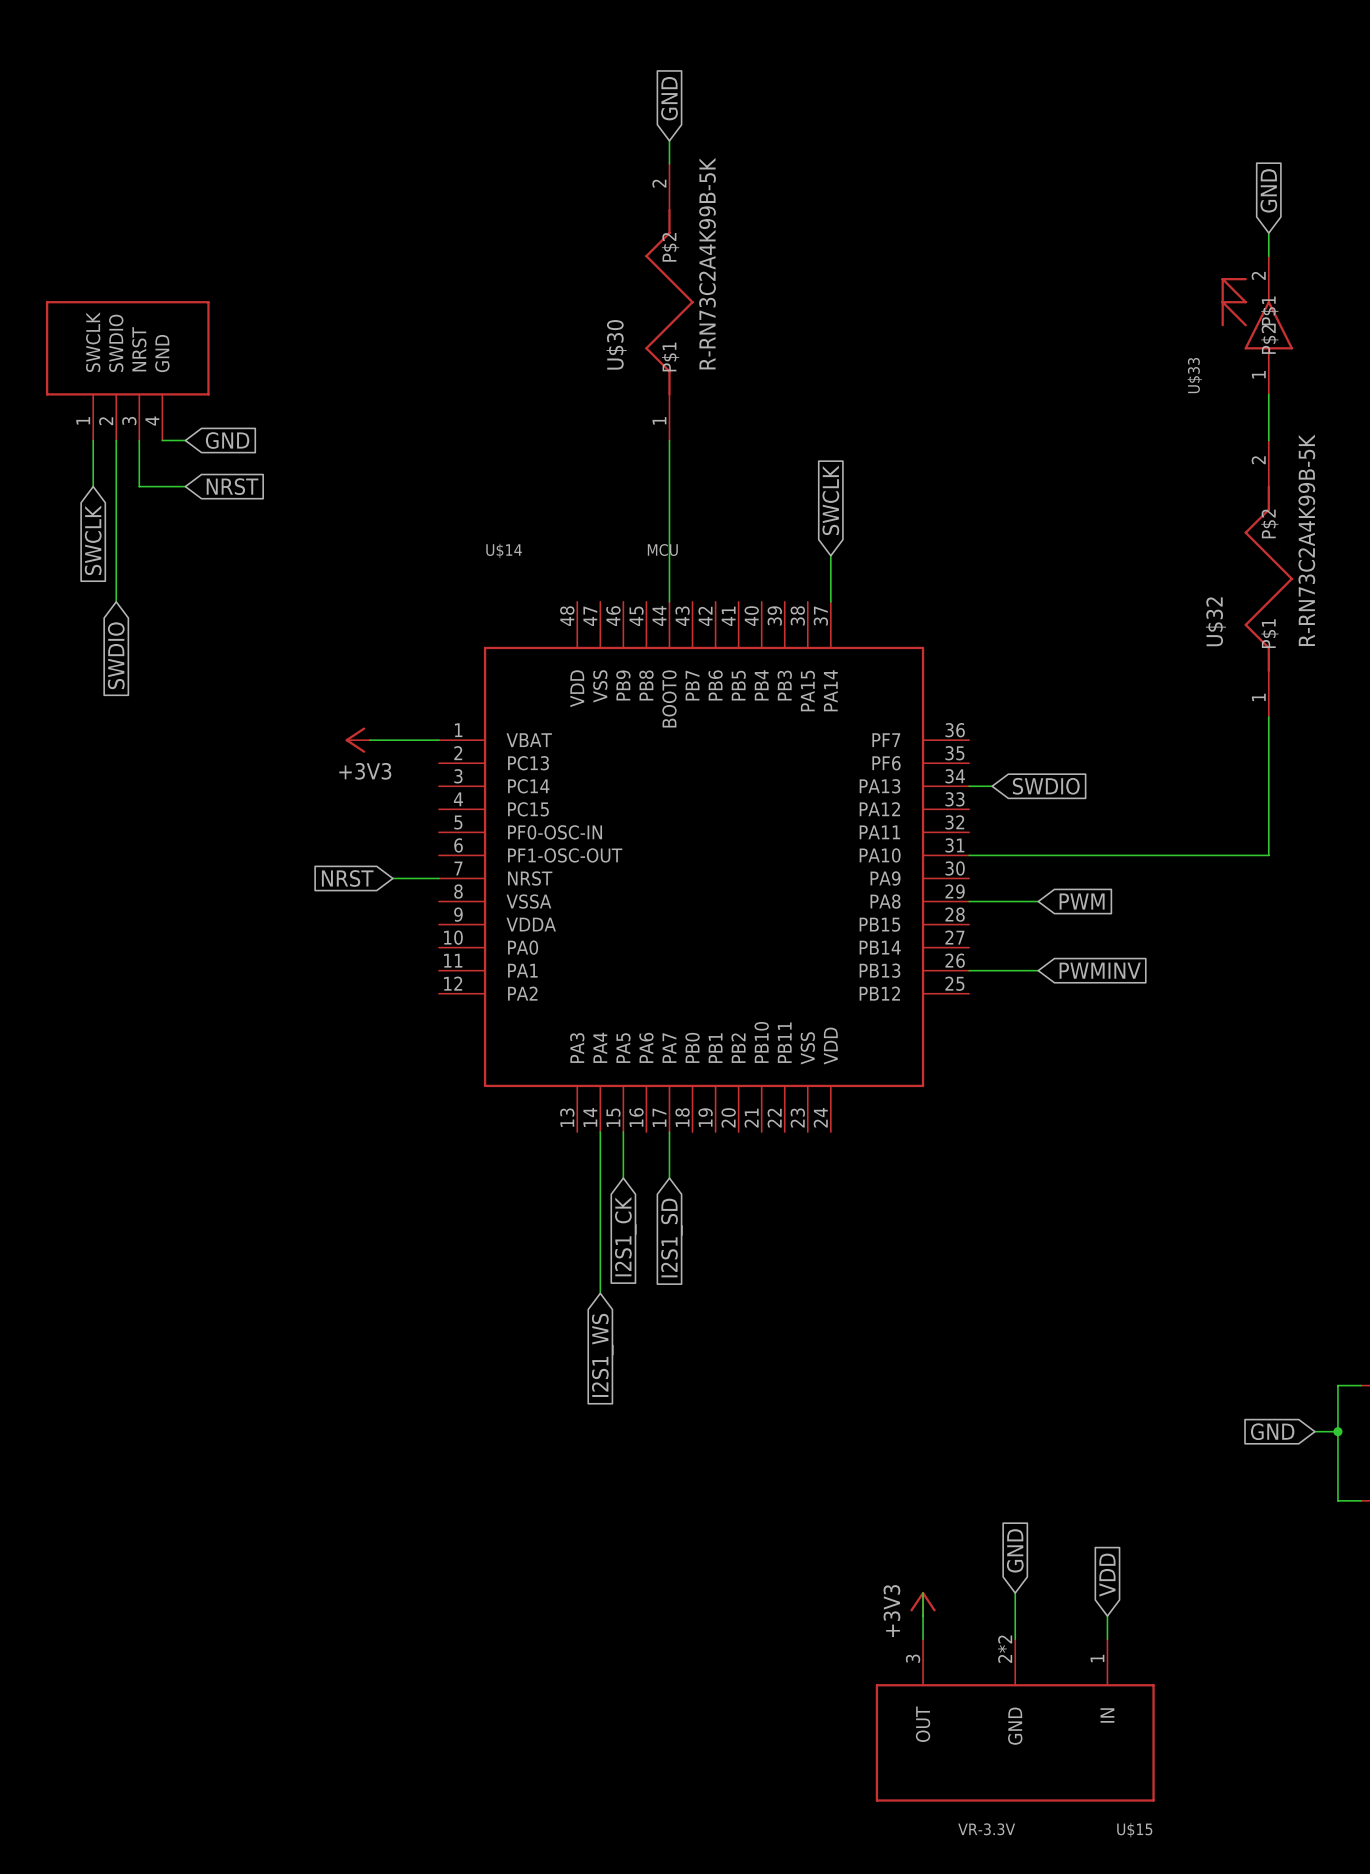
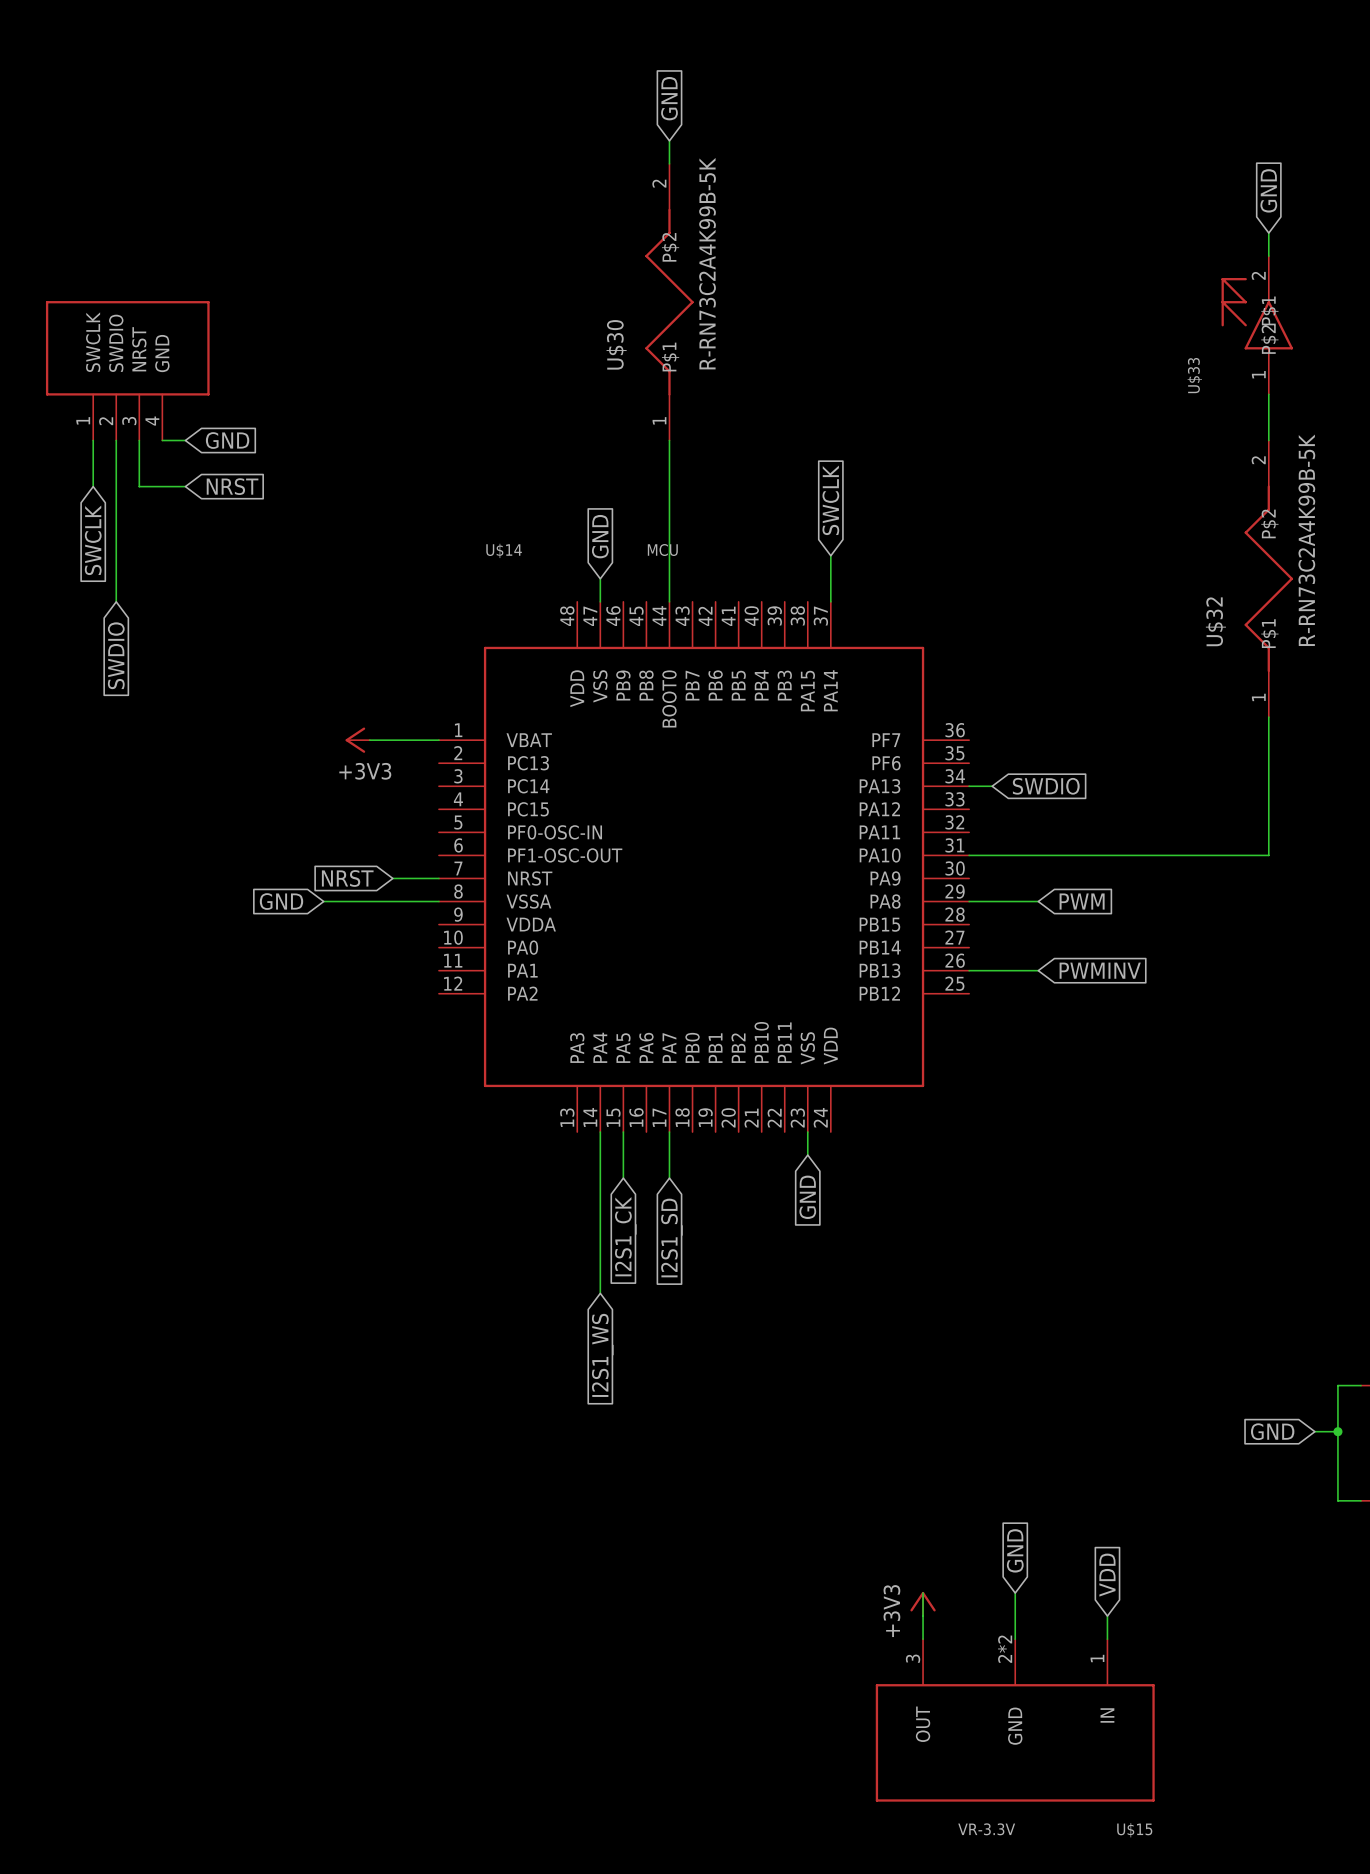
global label: none -> GND (600, 536)
wire: none -> (600, 578) (600, 601)
global label: none -> GND (281, 901)
wire: none -> (323, 901) (438, 901)
wire: none -> (807, 1132) (807, 1155)
global label: none -> GND (807, 1197)

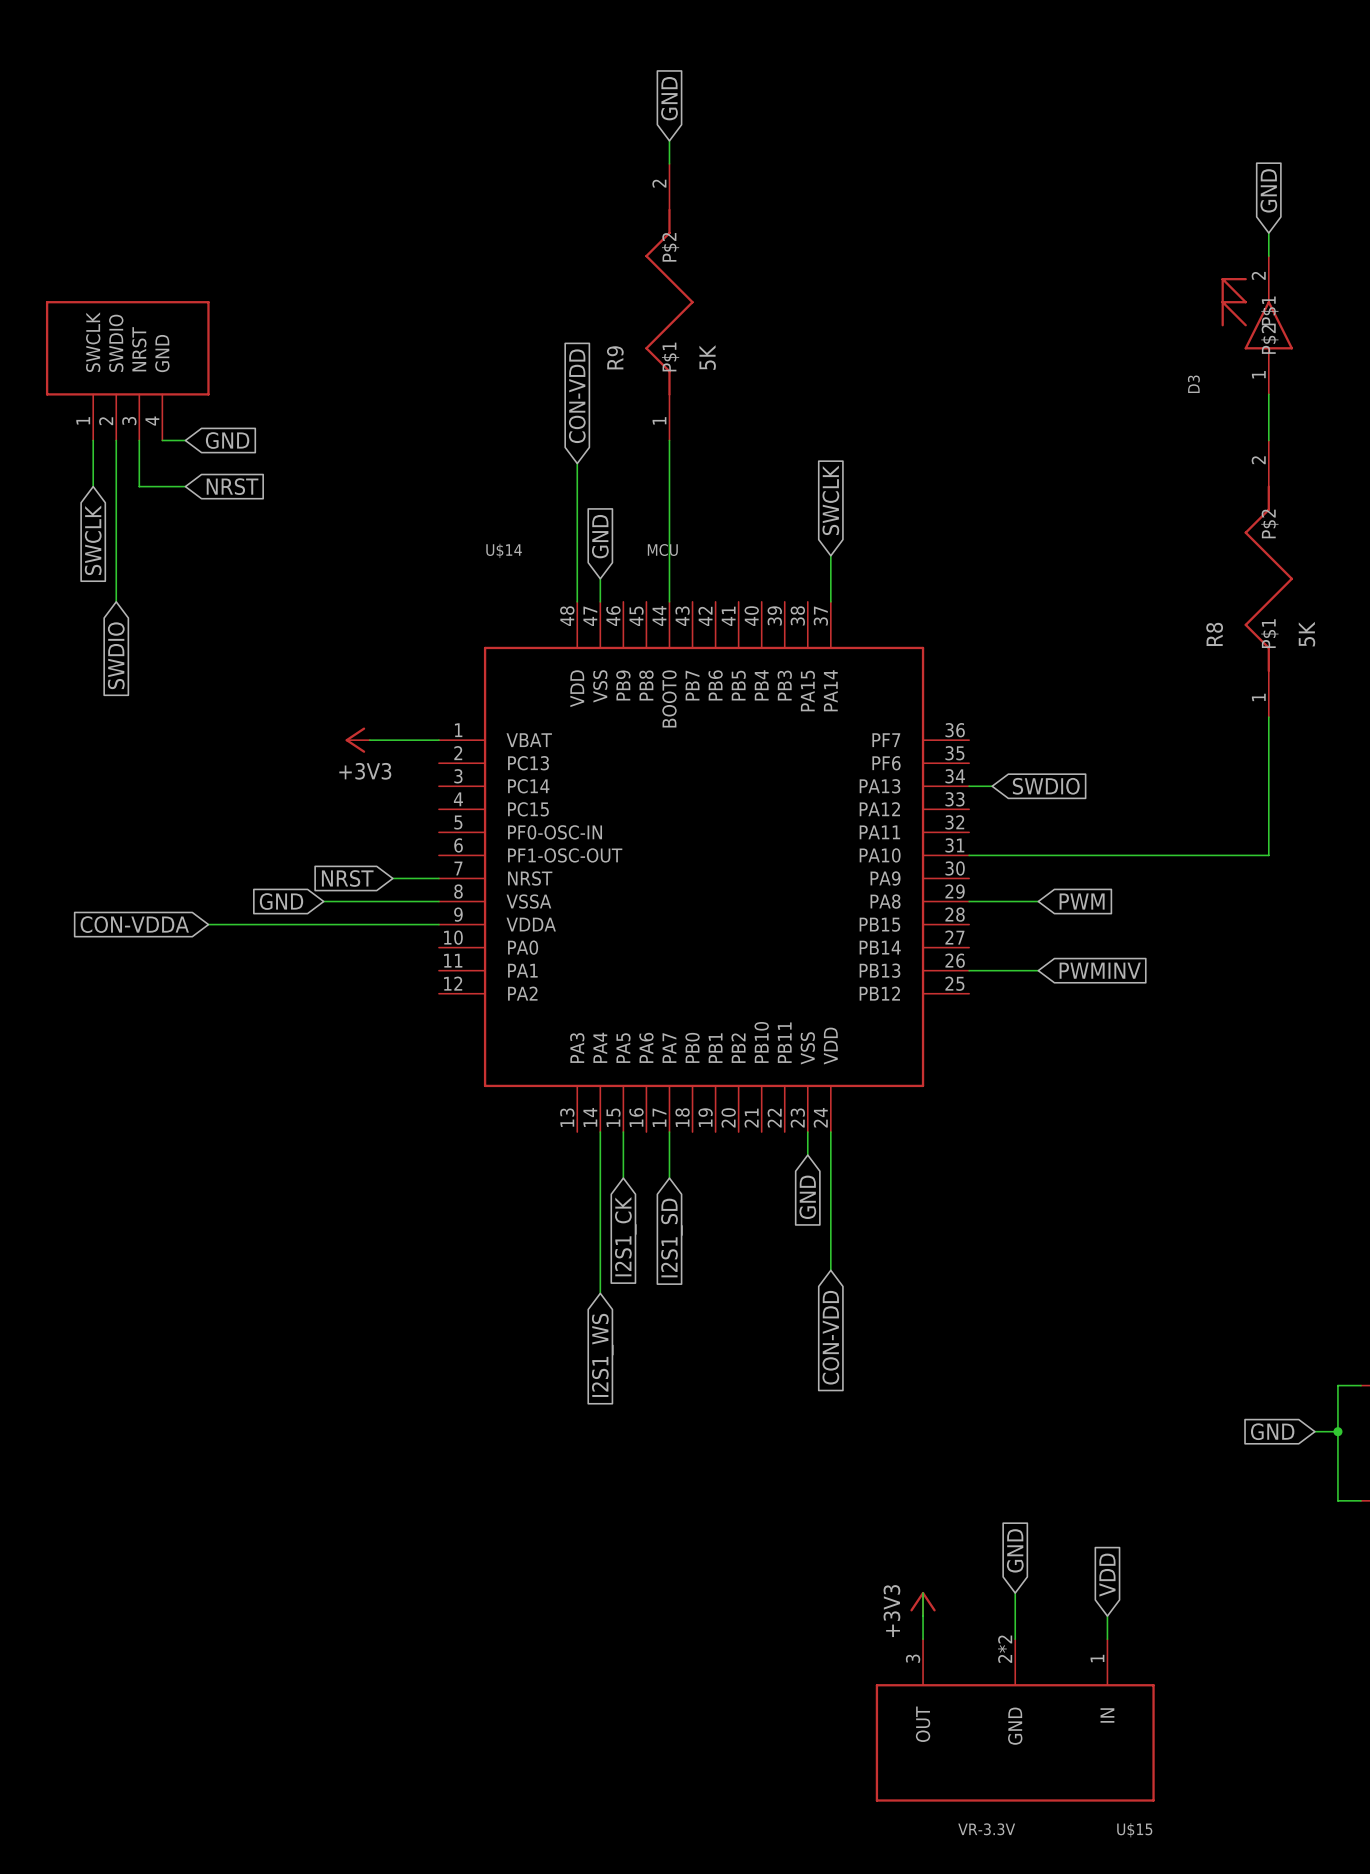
U$30 value: R-RN73C2A4K99B-5K (707, 263) -> 5K (707, 357)
U$30 name: U$30 (616, 344) -> R9 (615, 357)
U$33 name: U$33 (1194, 375) -> D3 (1193, 384)
global label: none -> CON-VDD (577, 396)
wire: none -> (577, 463) (577, 601)
U$32 value: R-RN73C2A4K99B-5K (1306, 540) -> 5K (1306, 634)
U$32 name: U$32 (1215, 621) -> R8 (1214, 634)
global label: none -> CON-VDDA (134, 924)
wire: none -> (208, 924) (438, 924)
wire: none -> (830, 1132) (830, 1270)
global label: none -> CON-VDD (830, 1337)

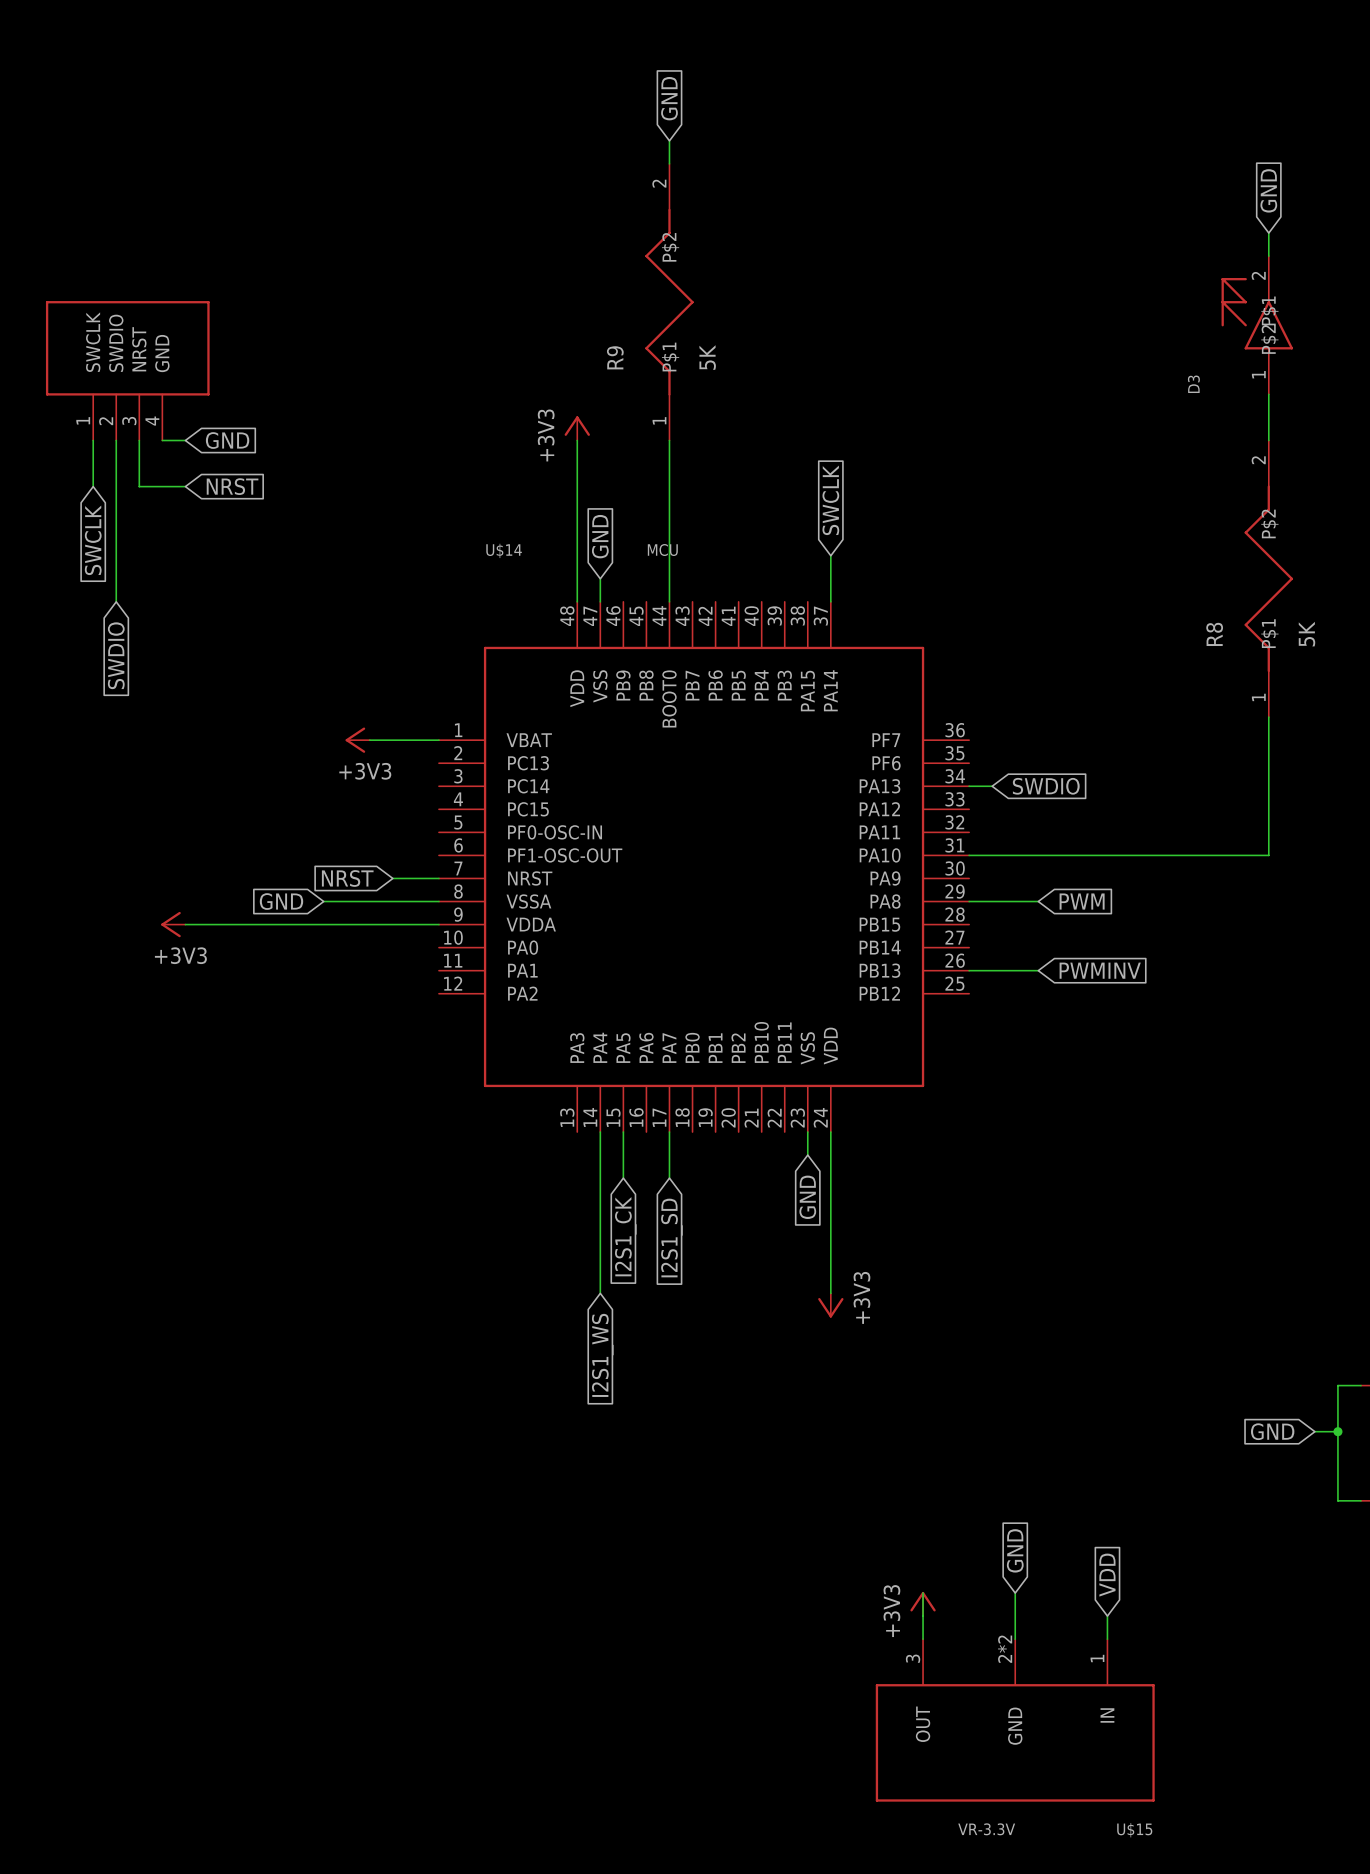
global label: CON-VDD (577, 396) -> none
power symbol: none -> +3V3 (577, 428)
wire: none -> (577, 440) (577, 463)
global label: CON-VDDA (134, 924) -> none
power symbol: none -> +3V3 (173, 924)
wire: none -> (185, 924) (208, 924)
wire: none -> (830, 1270) (830, 1293)
power symbol: none -> +3V3 (830, 1305)
global label: CON-VDD (830, 1337) -> none

